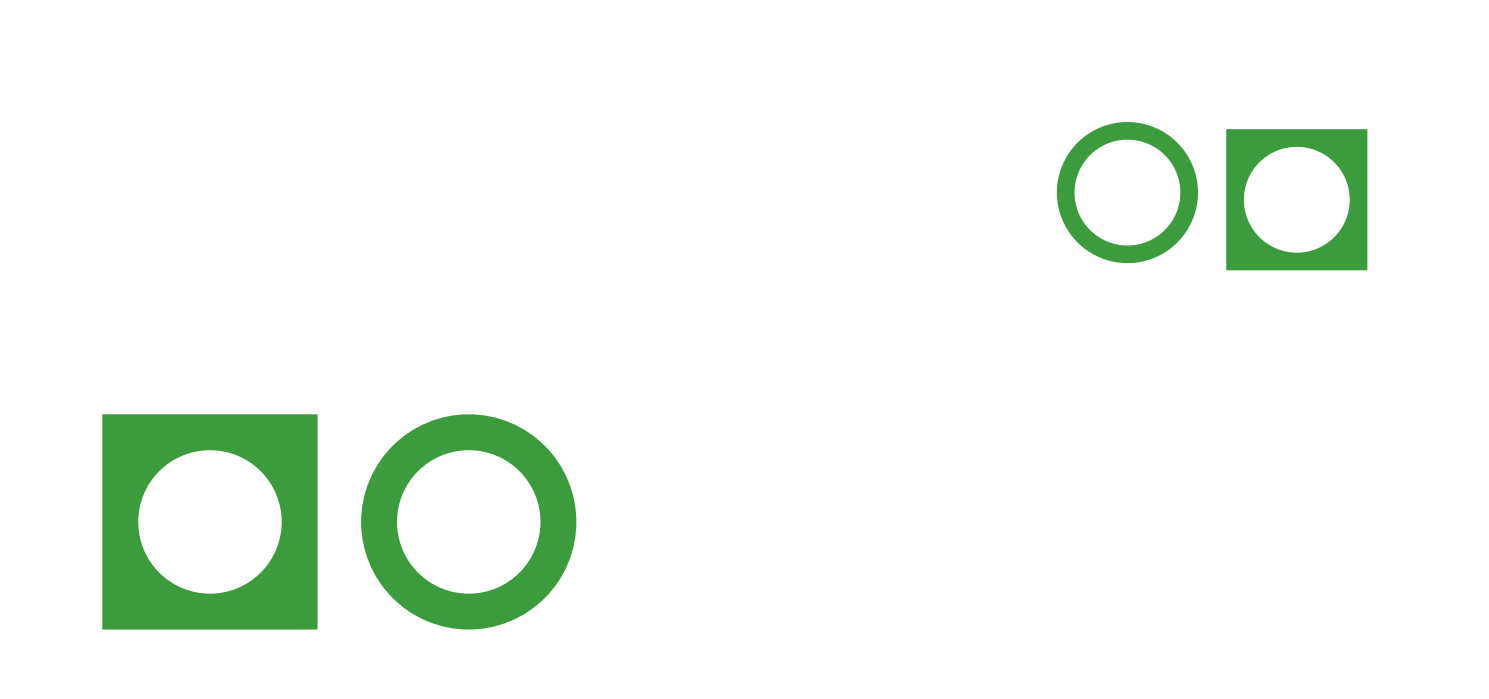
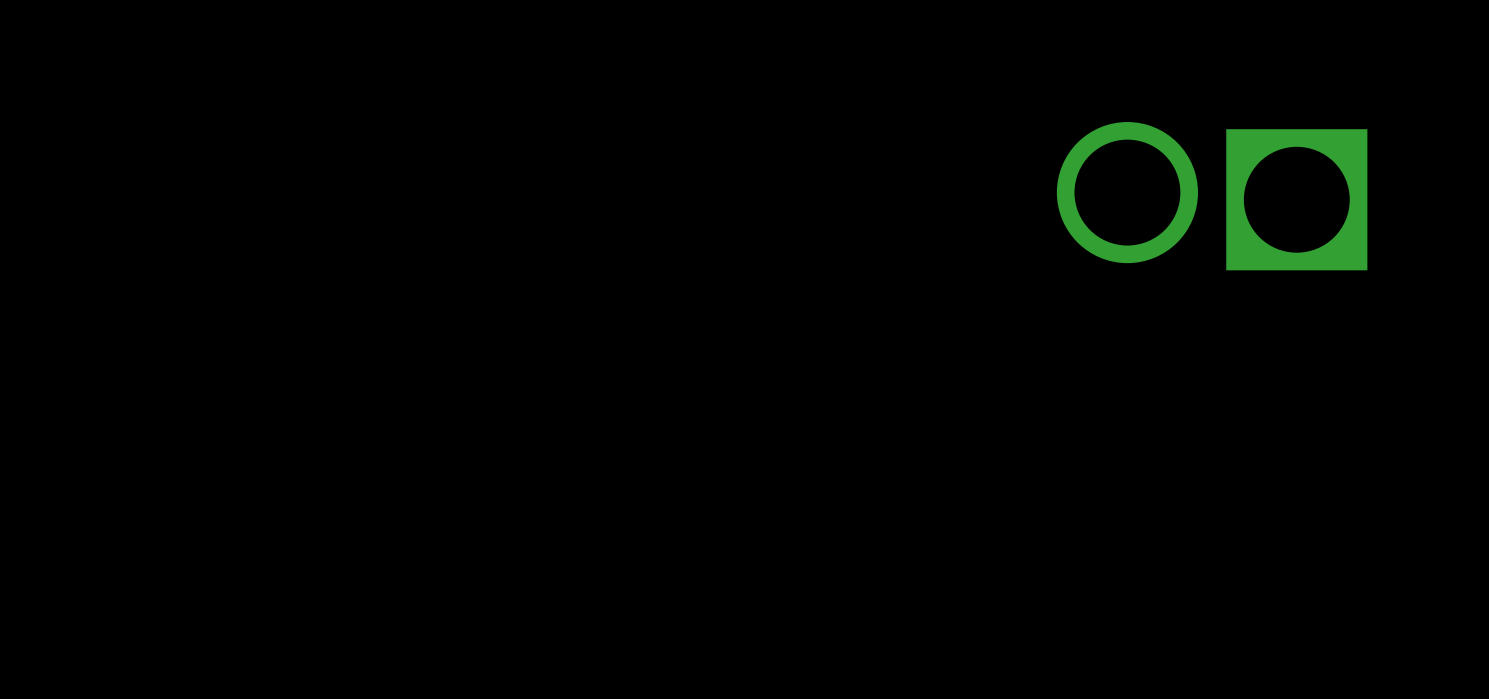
part: (339, 521) -> none

